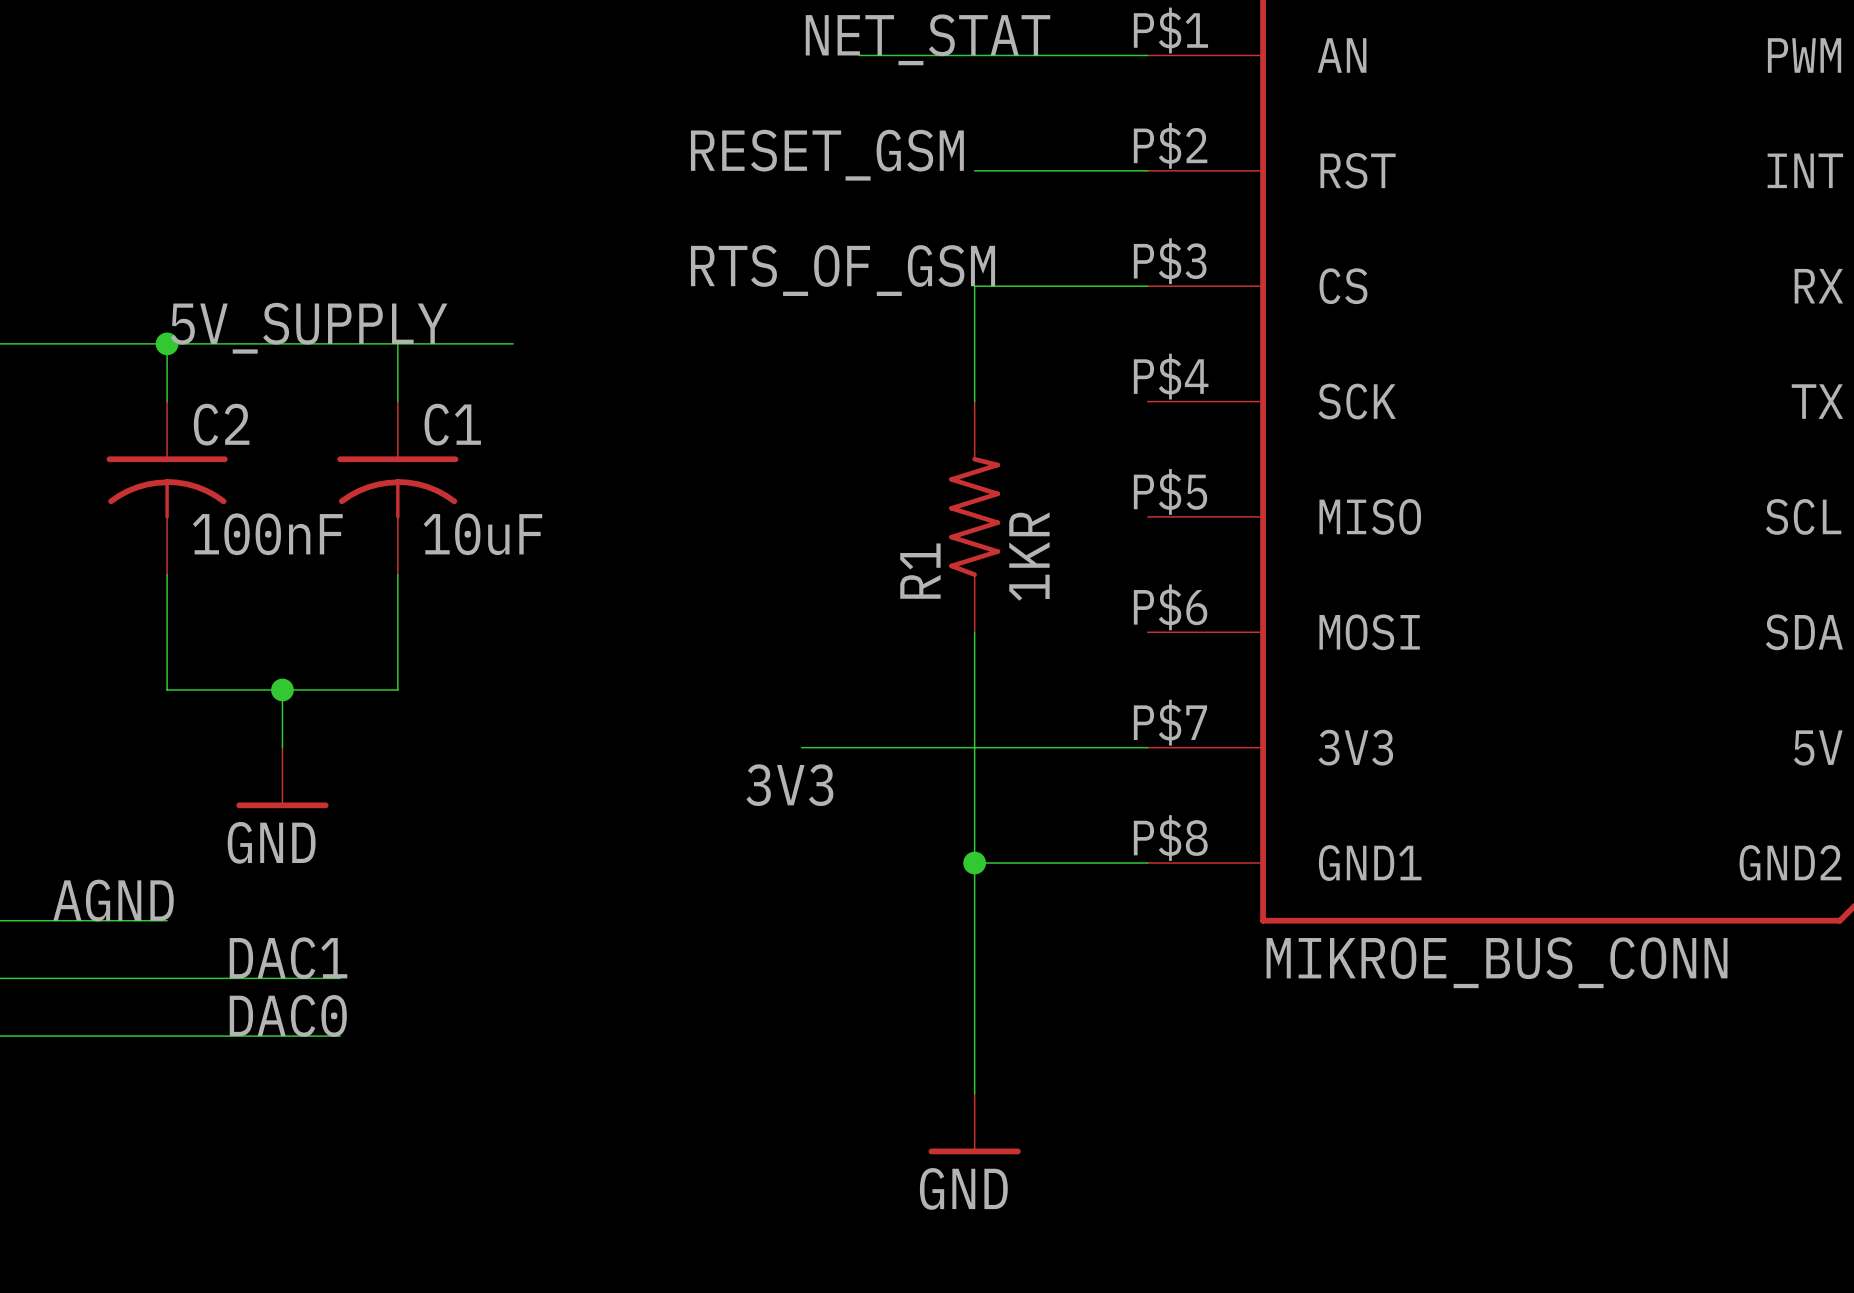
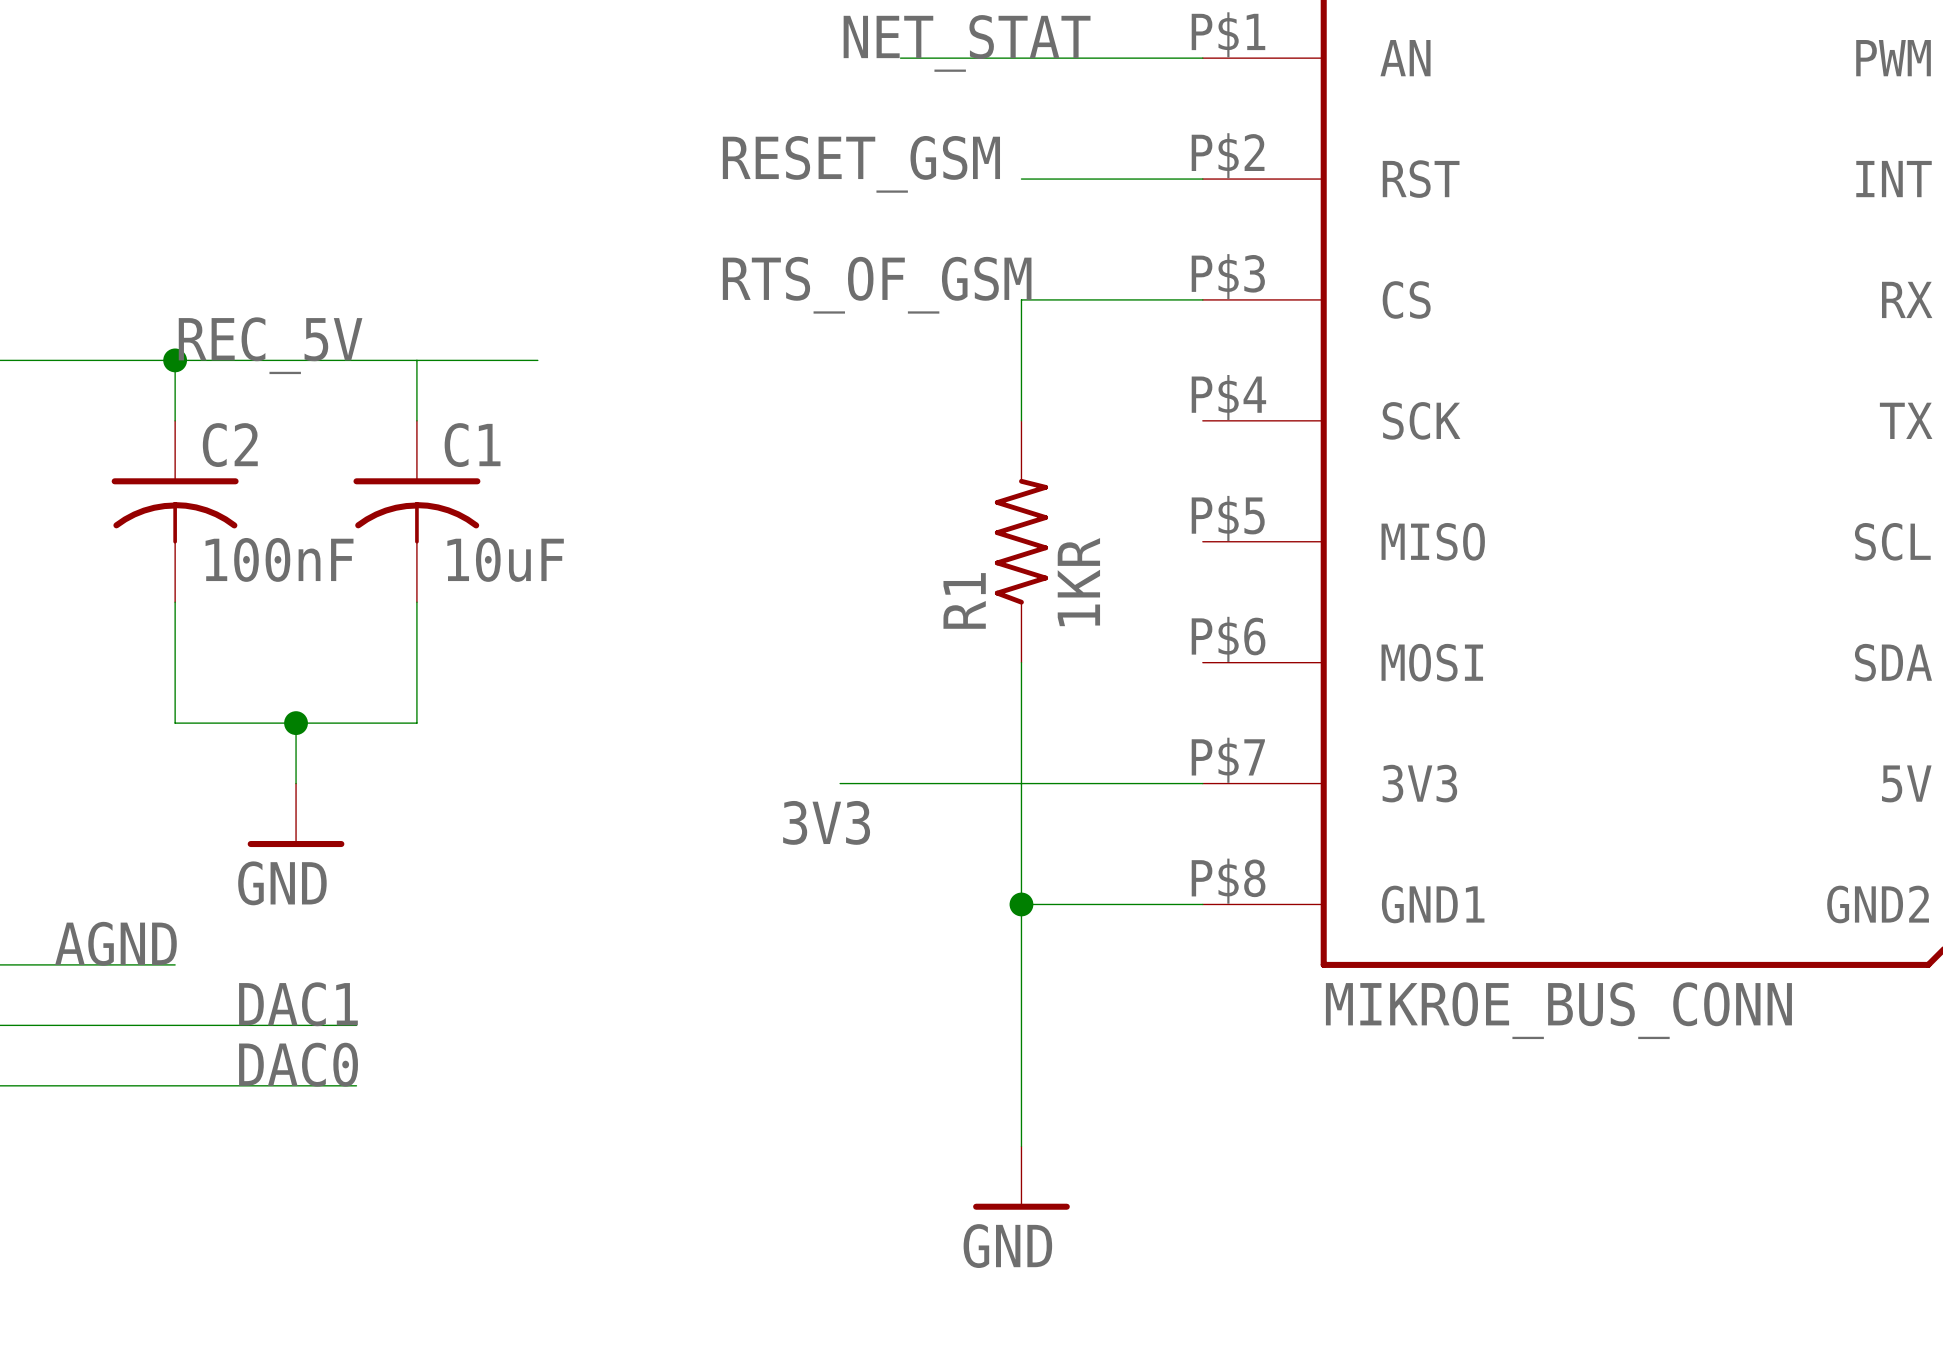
label: 5V_SUPPLY (309, 328) -> REC_5V (270, 345)

